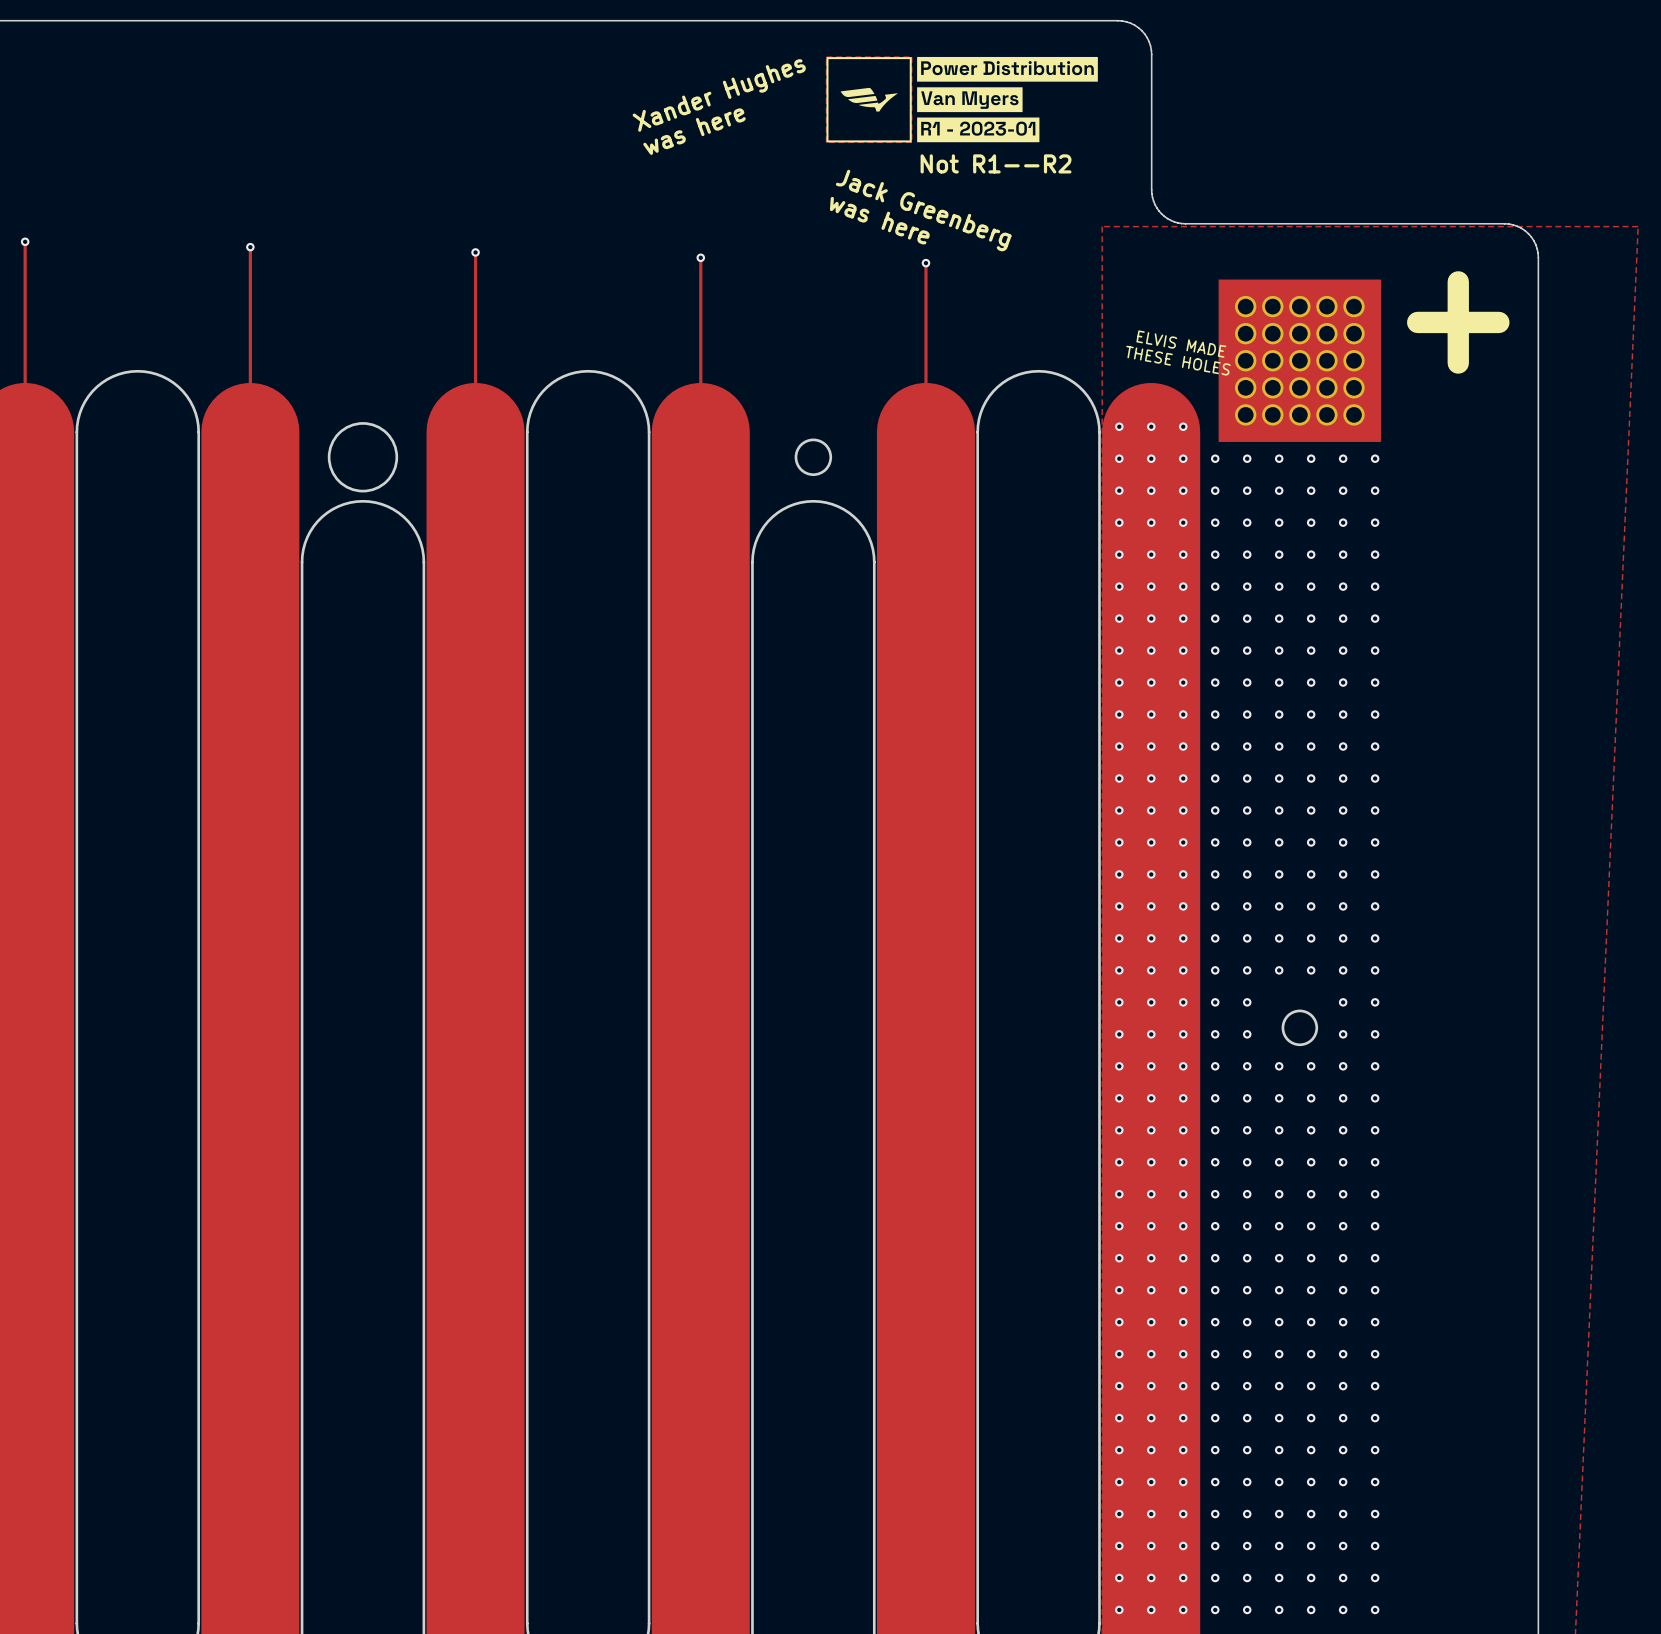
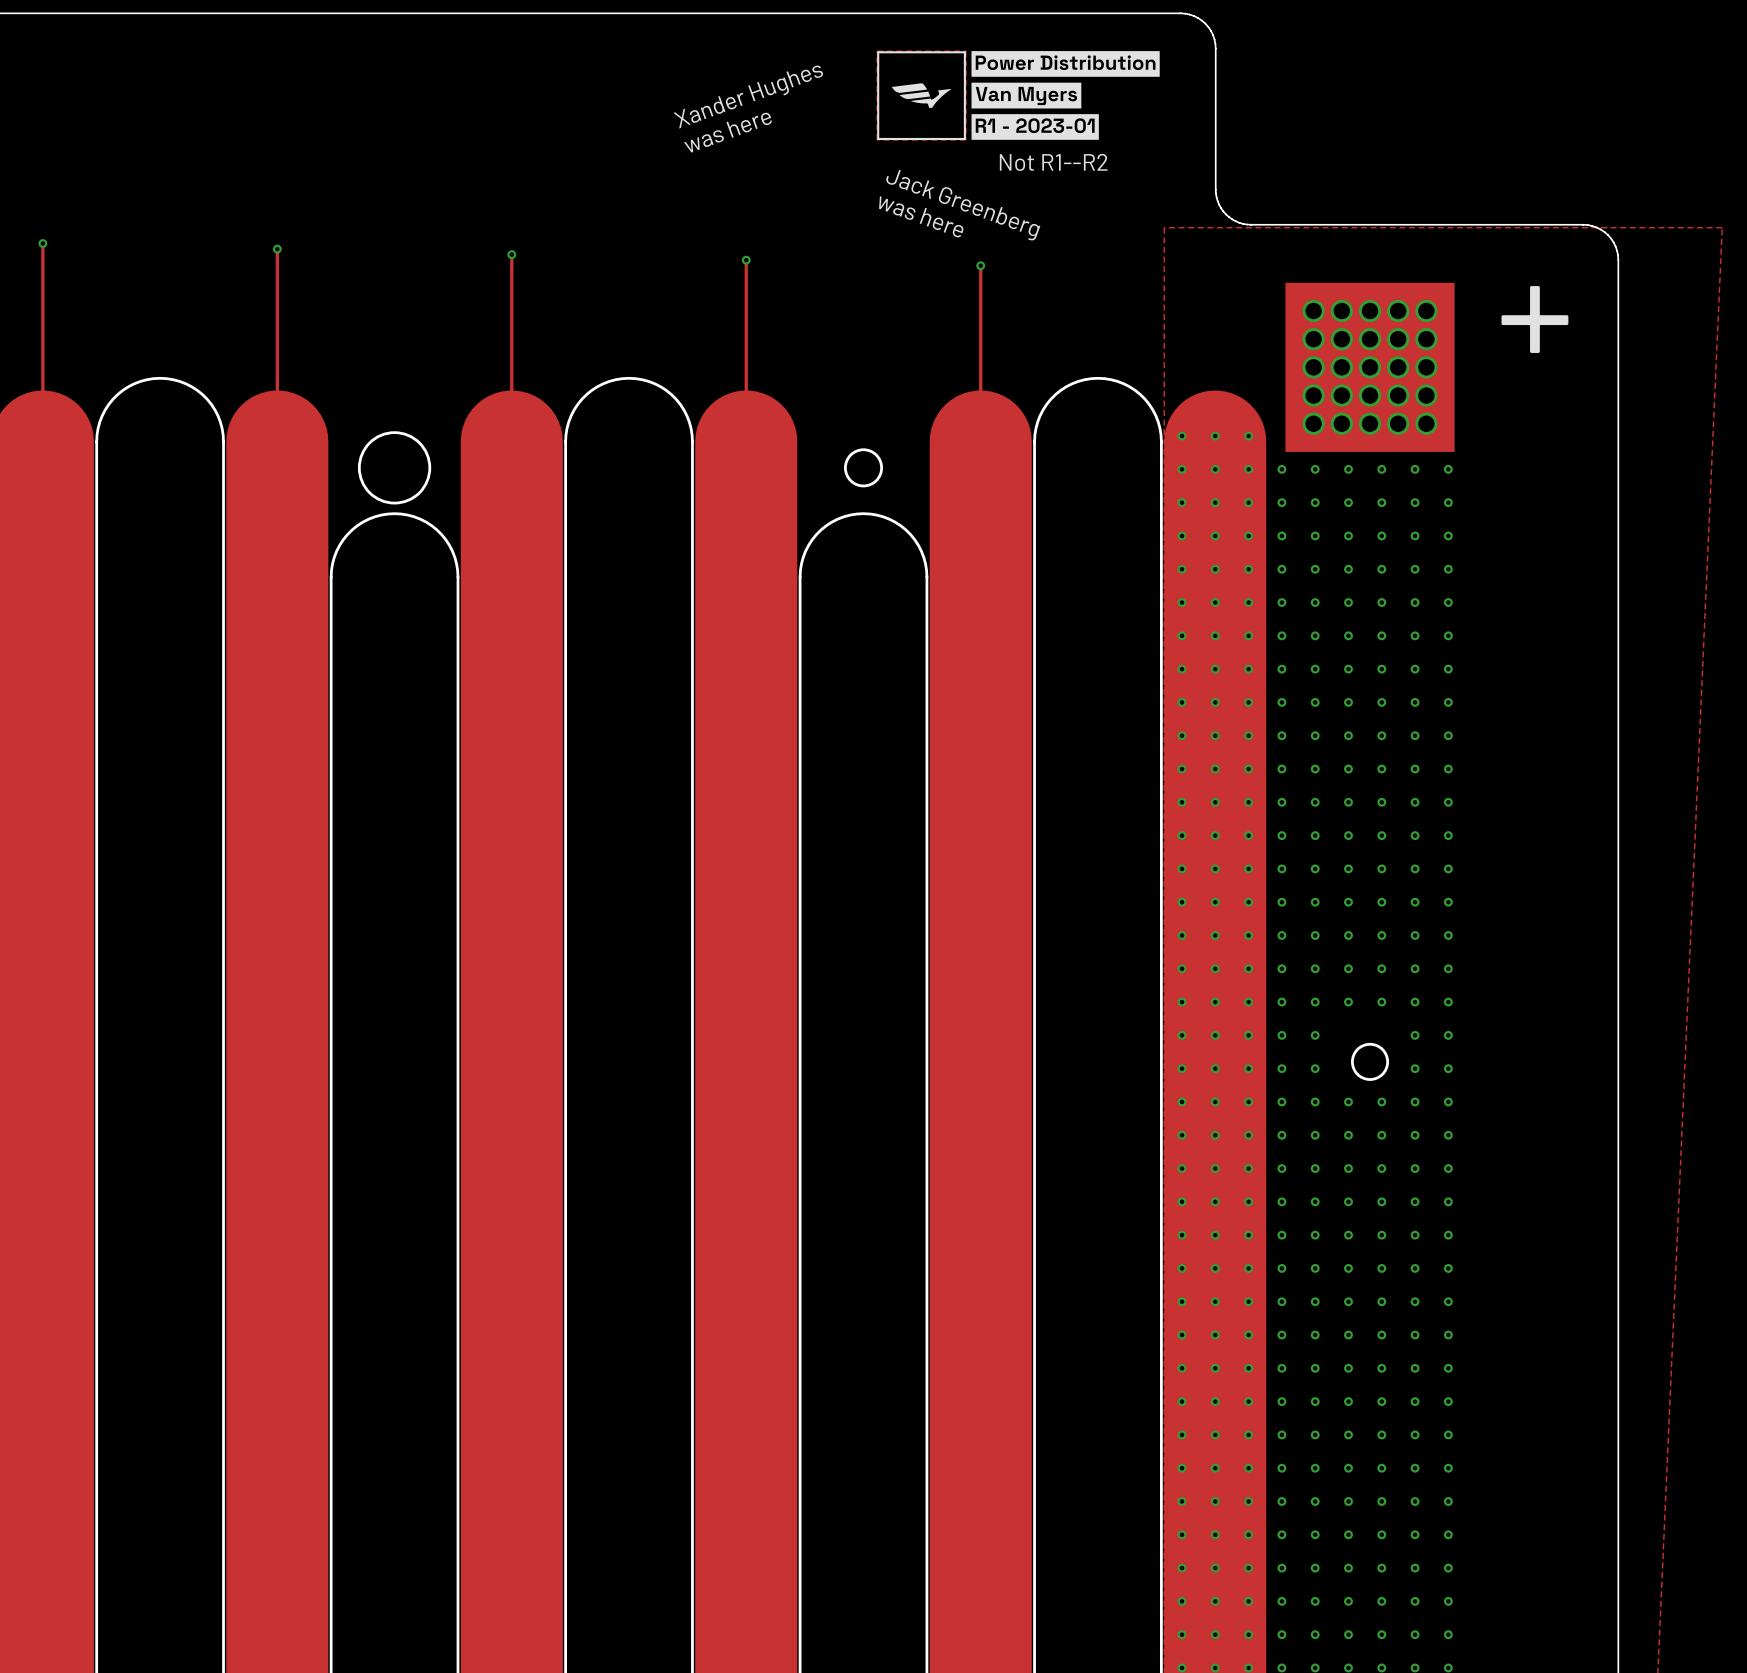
text: ELVIS MADE (1181, 344) -> none
text: THESE HOLES (1178, 360) -> none

